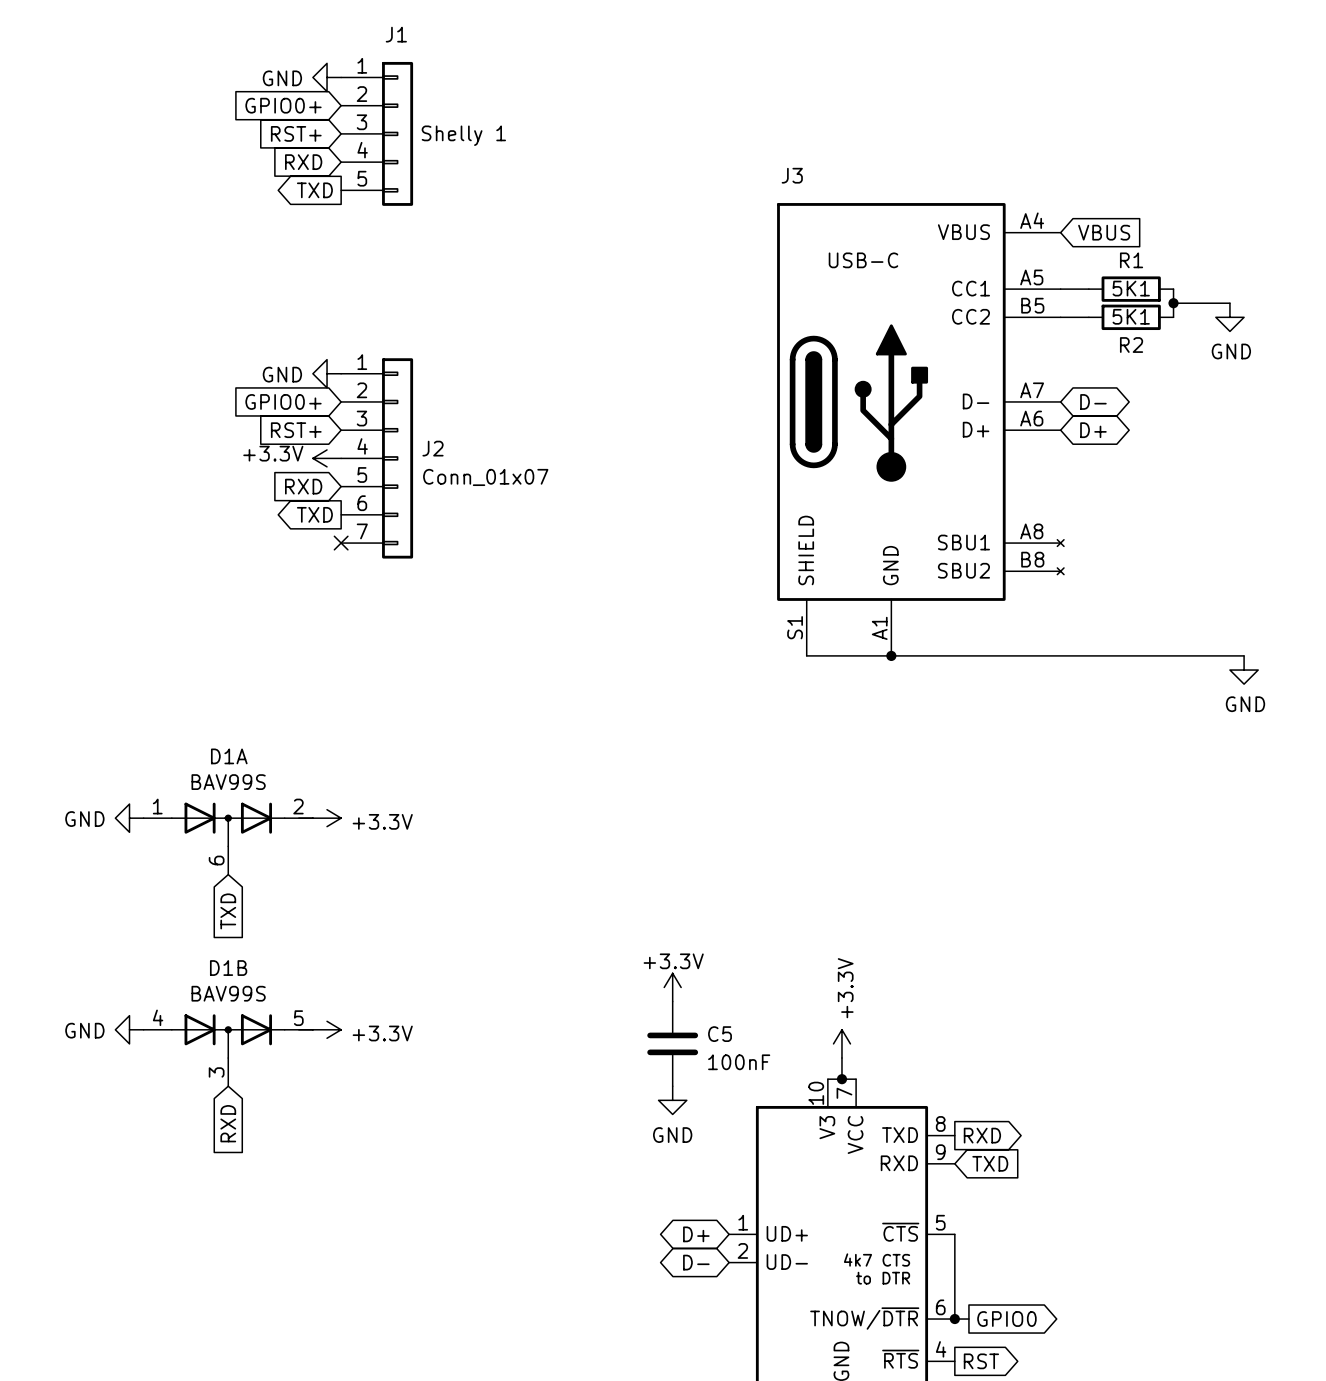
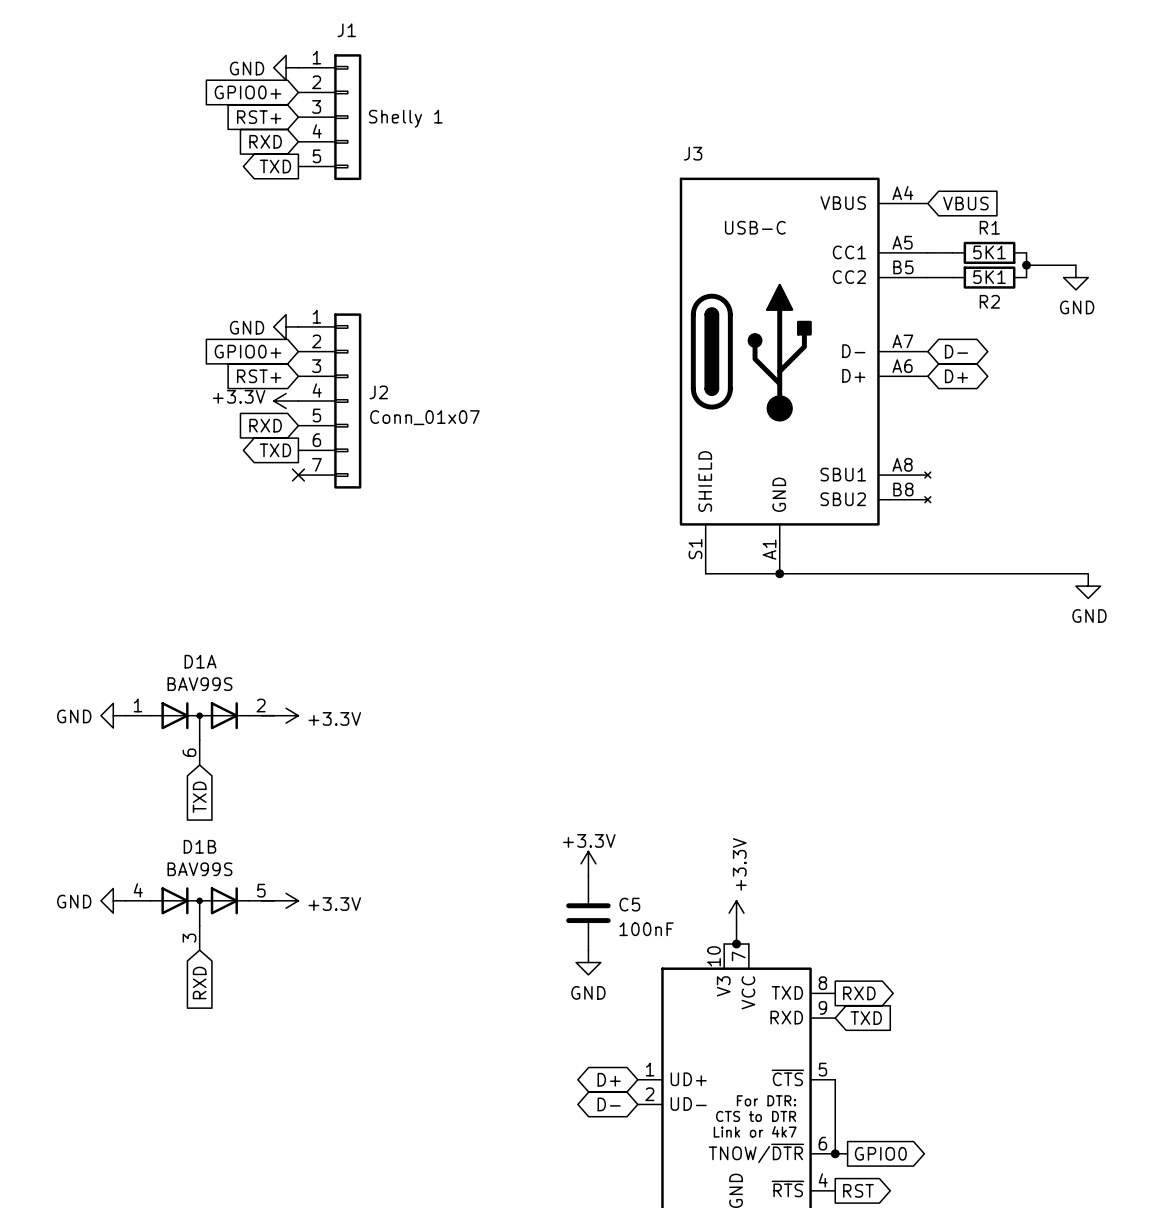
part text: none -> For DTR: (766, 1100)
part text: 4k7 CTS (877, 1260) -> none
part text: none -> CTS to DTR (756, 1116)
part text: to DTR (883, 1278) -> none
part text: none -> Link or 4k7 (755, 1131)

